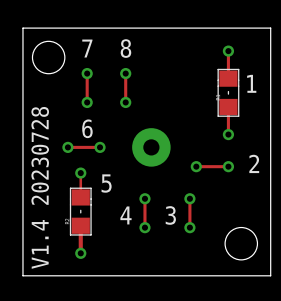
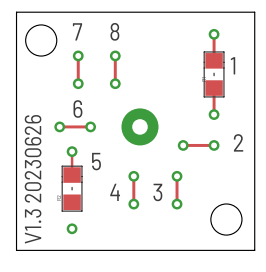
text: V1.4 20230728 (40, 187) -> V1.3 20230626 (33, 179)
top track: (80, 225) (80, 253) -> none

